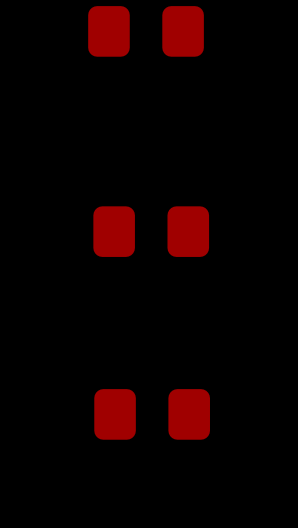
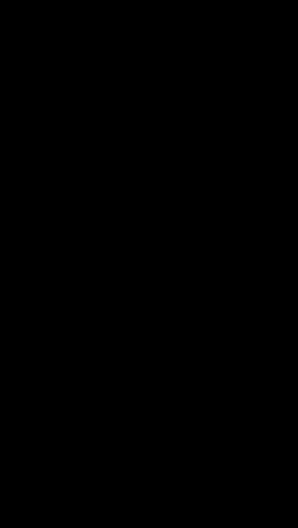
part: (146, 31) -> none
part: (151, 231) -> none
part: (152, 414) -> none

